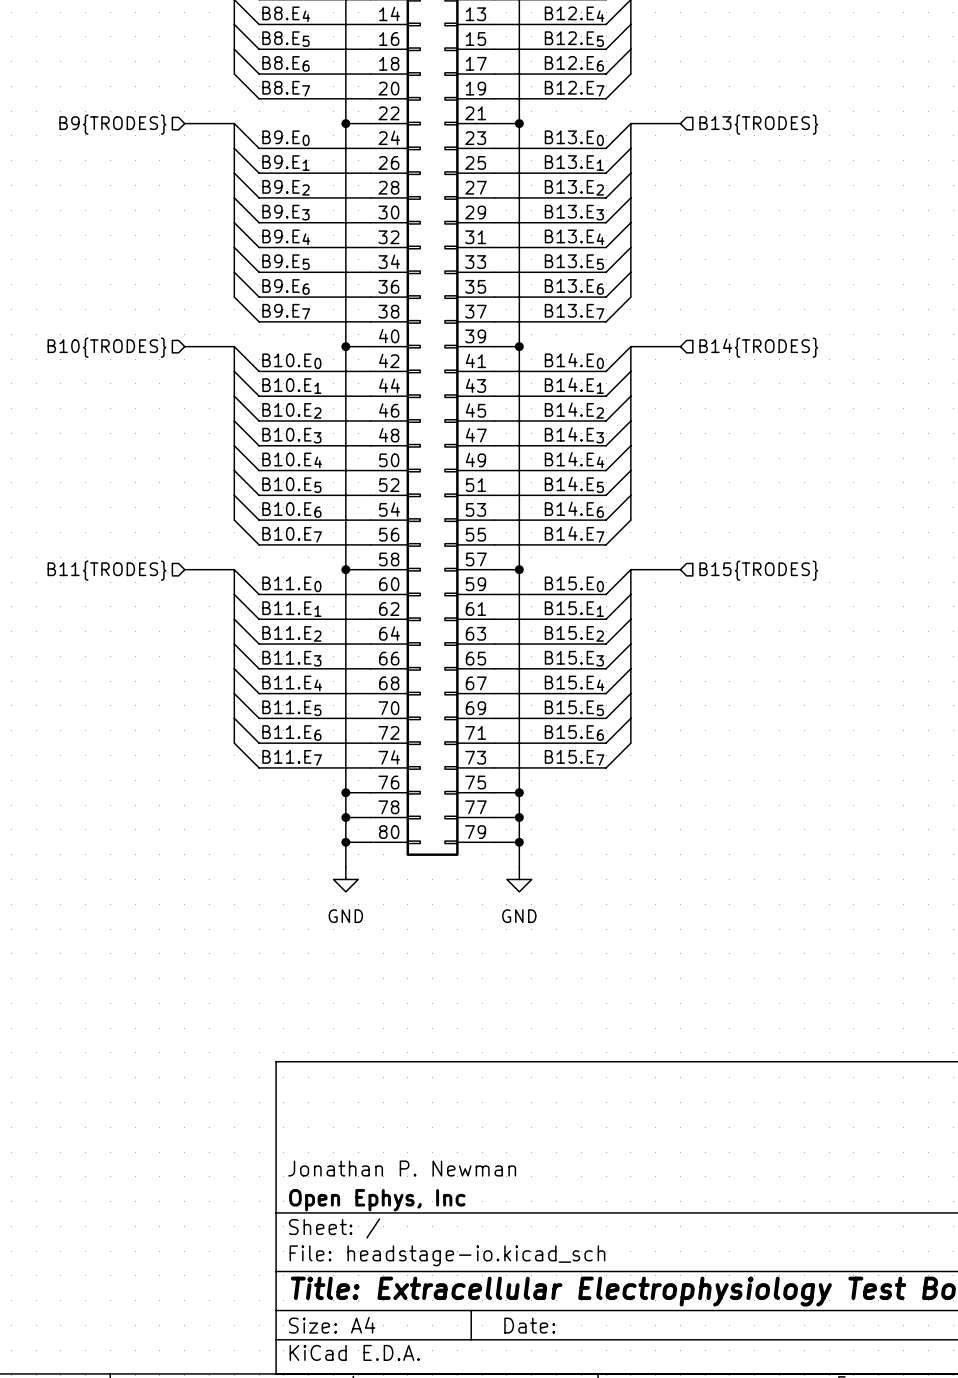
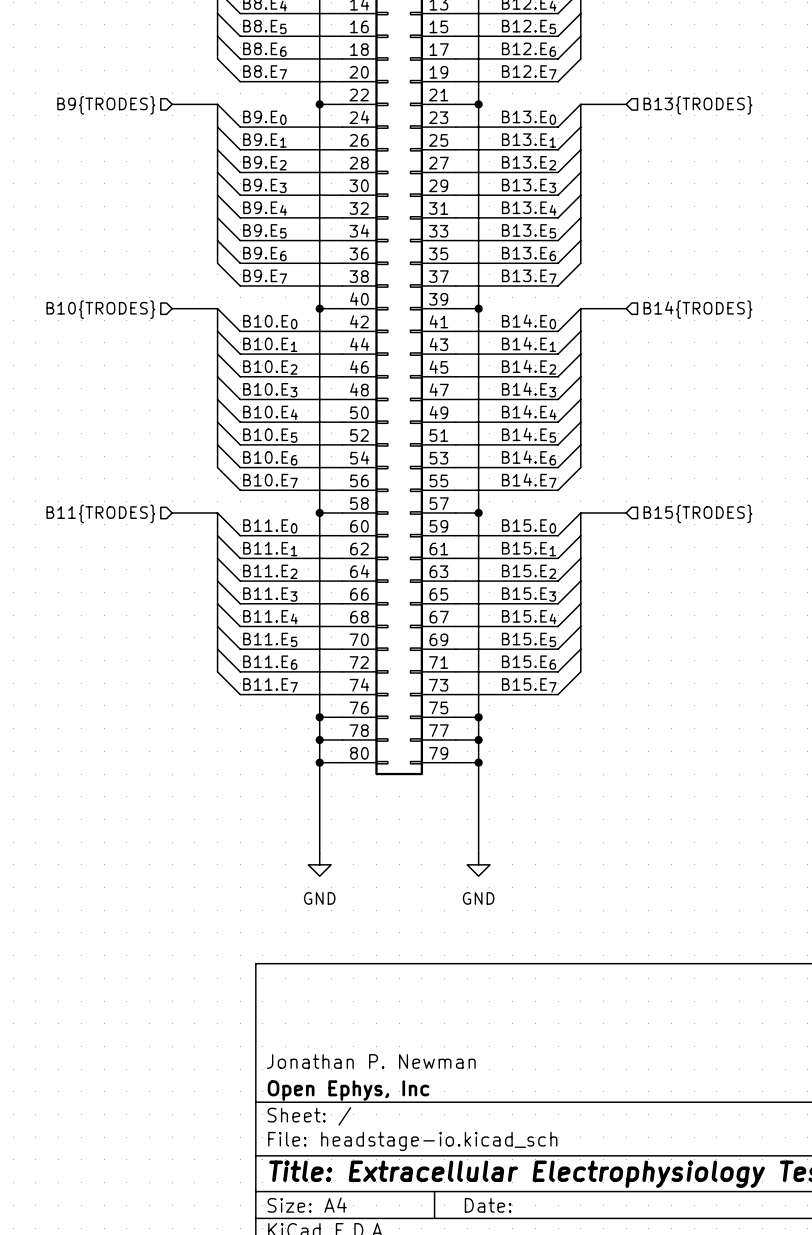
wire: none -> (319, 785) (319, 853)
wire: none -> (478, 785) (478, 853)
power symbol position: GND (345, 879) -> GND (319, 864)
power symbol position: GND (519, 879) -> GND (478, 864)

